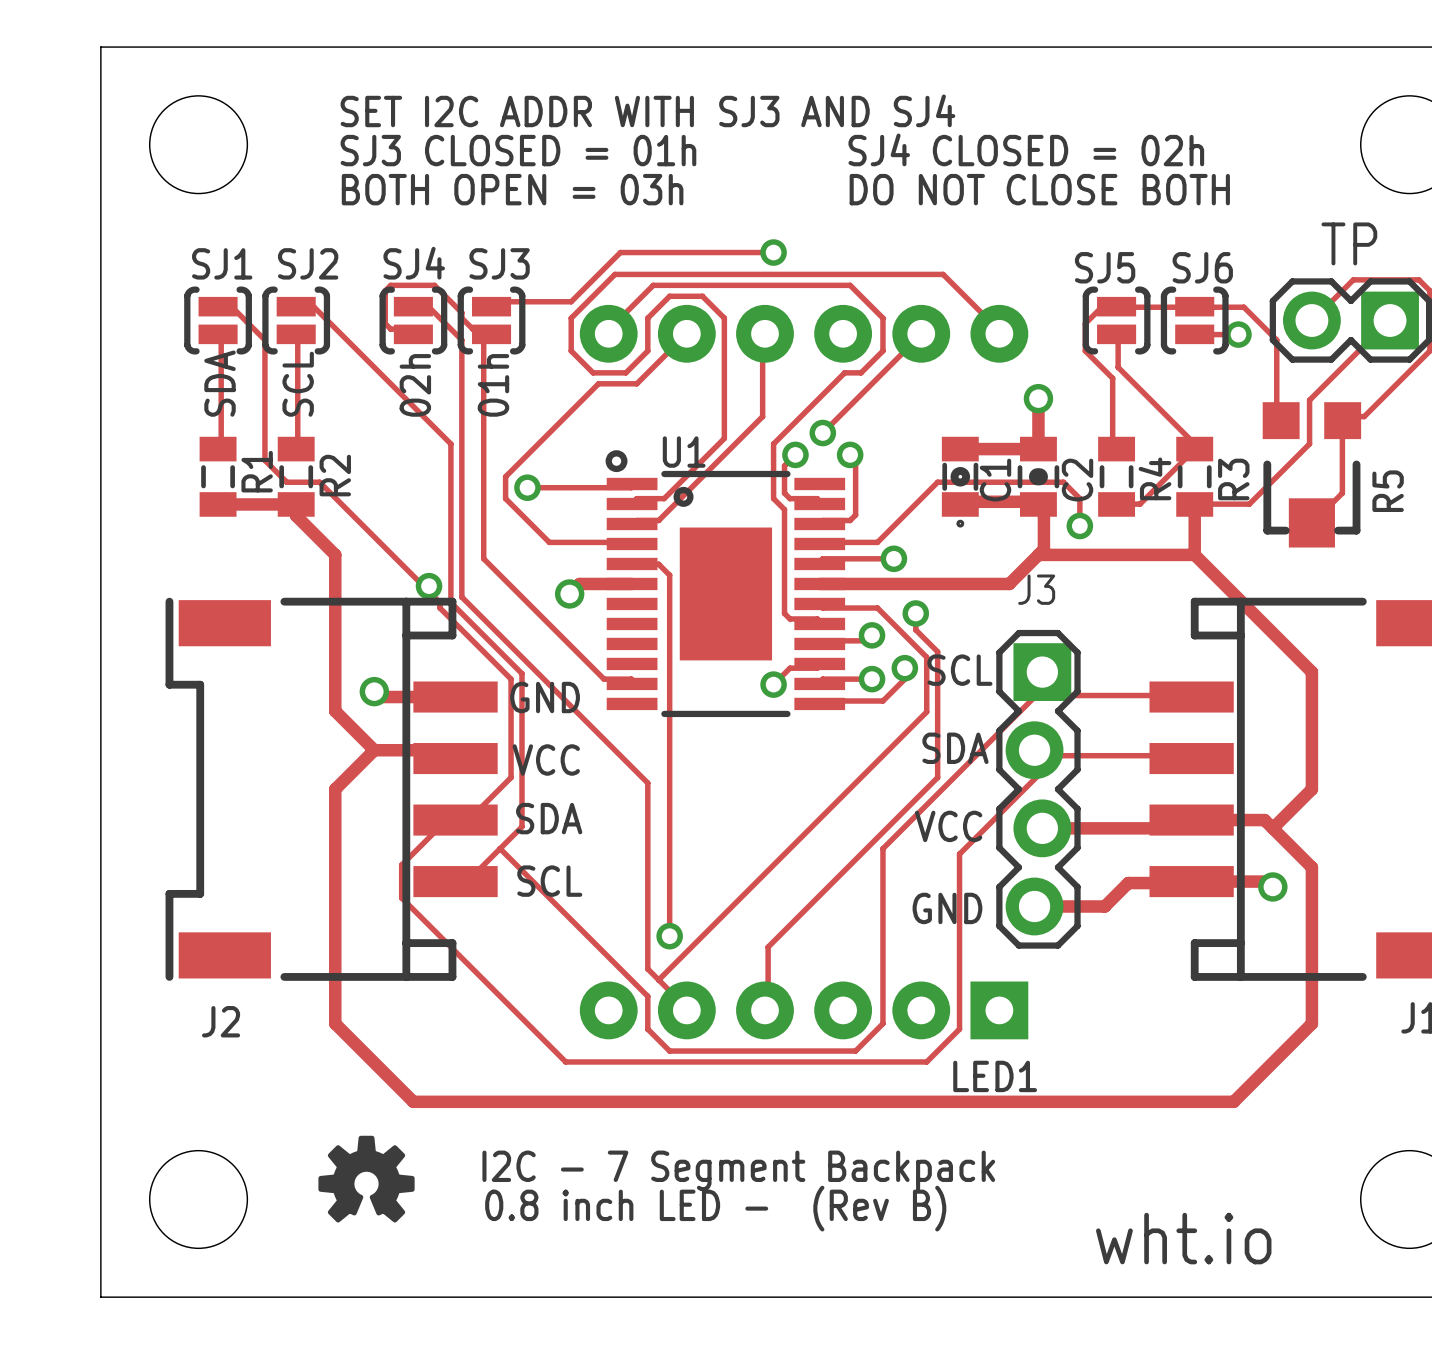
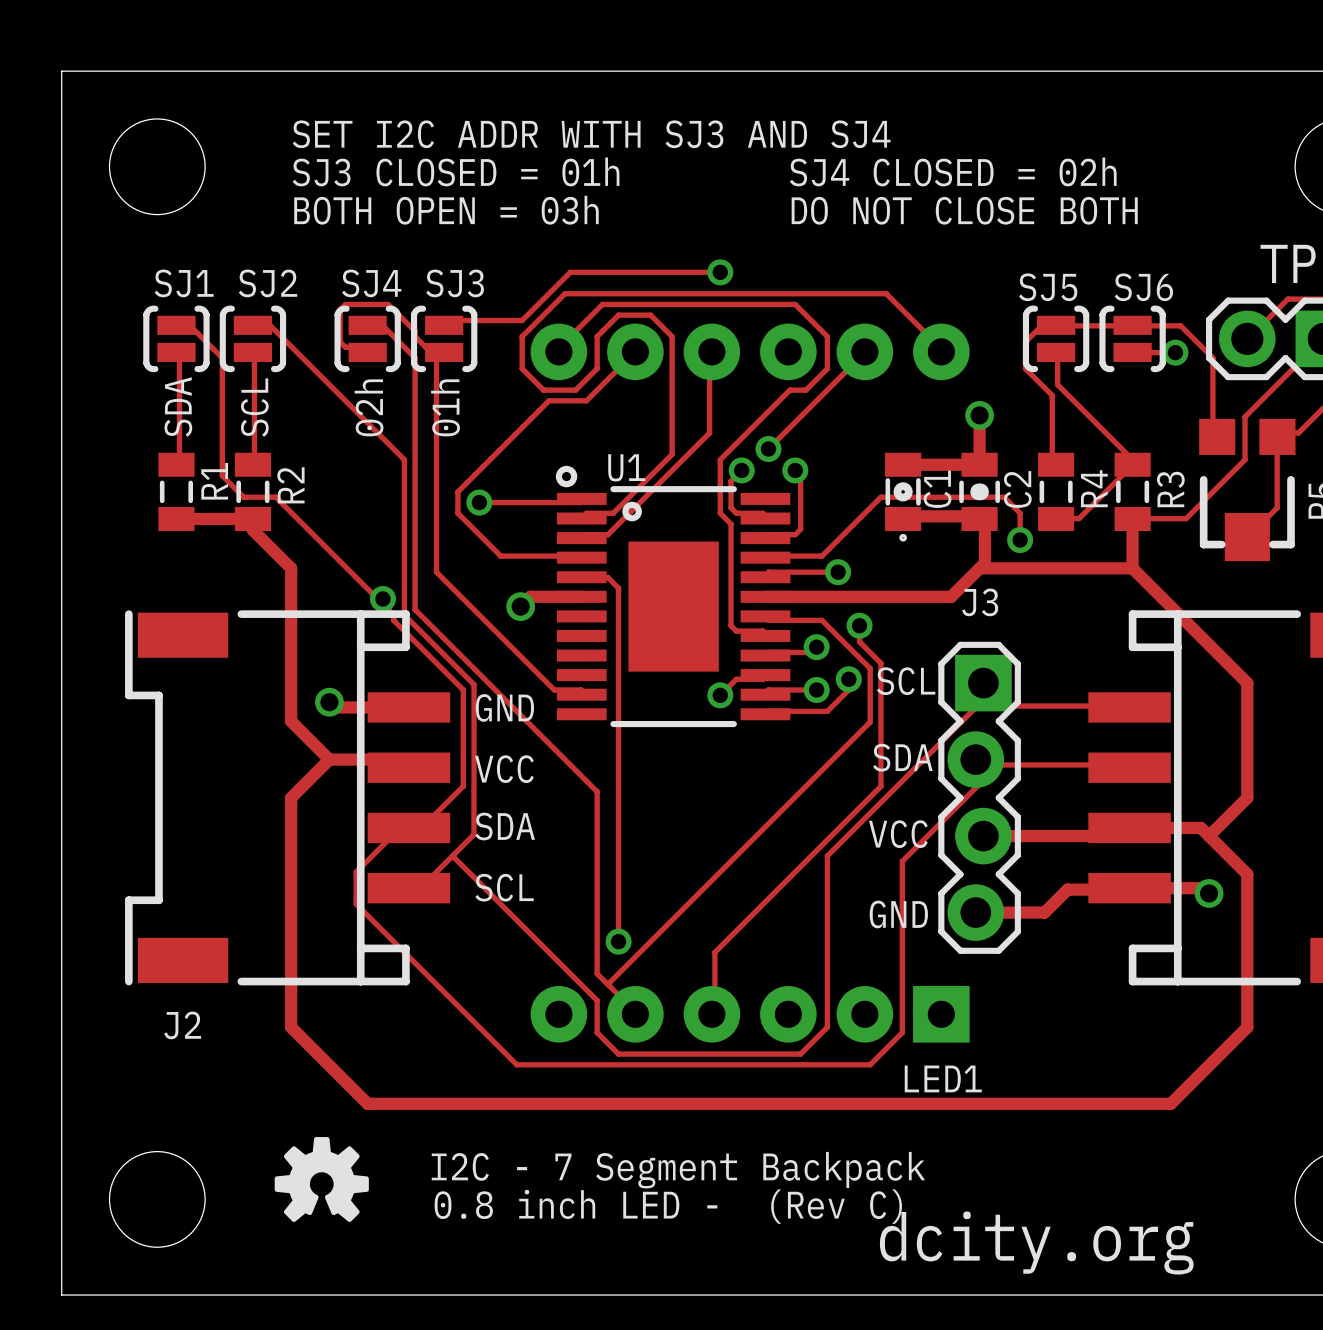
text: 0.8 inch LED - (Rev B) (715, 1208) -> 0.8 inch LED - (Rev C) (668, 1206)
text: wht.io (1183, 1238) -> none
text: none -> dcity.org (1036, 1242)

